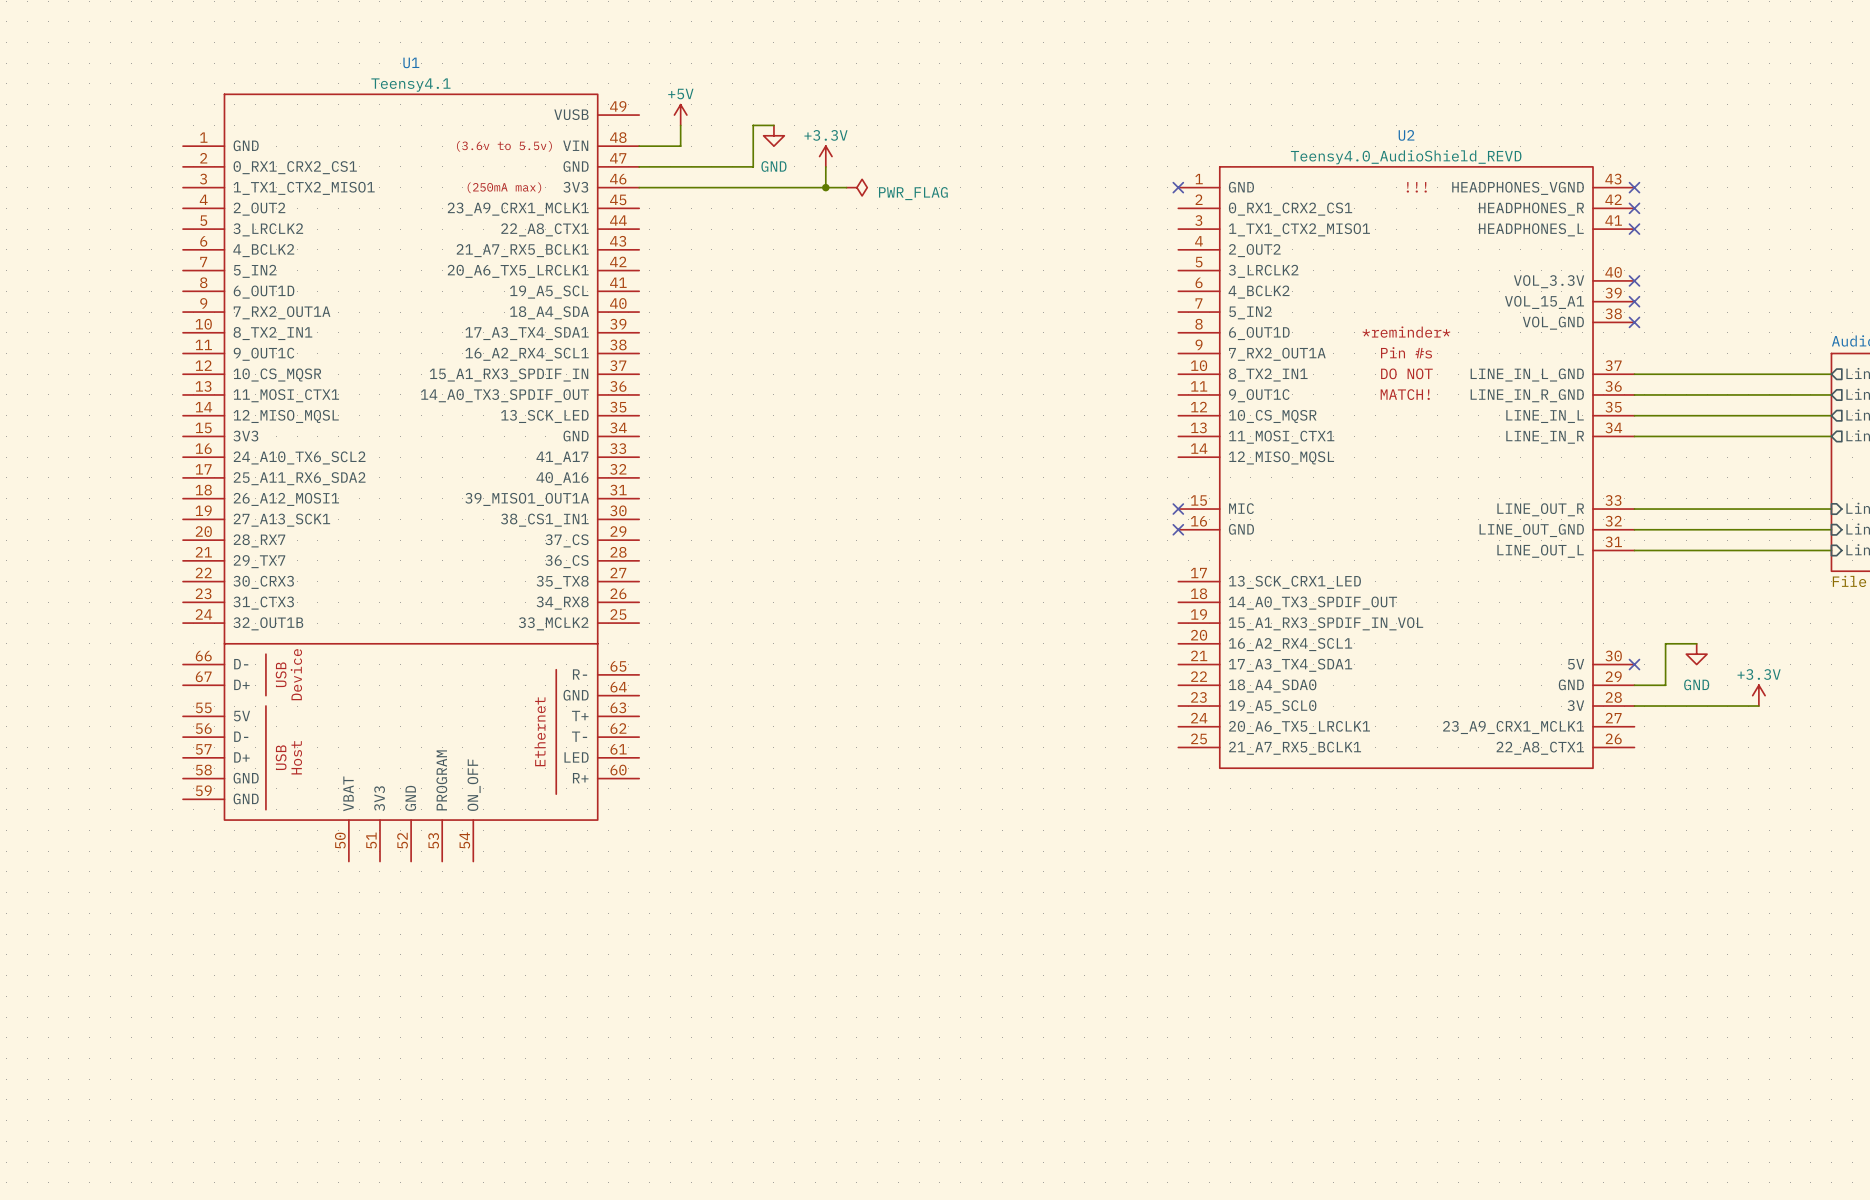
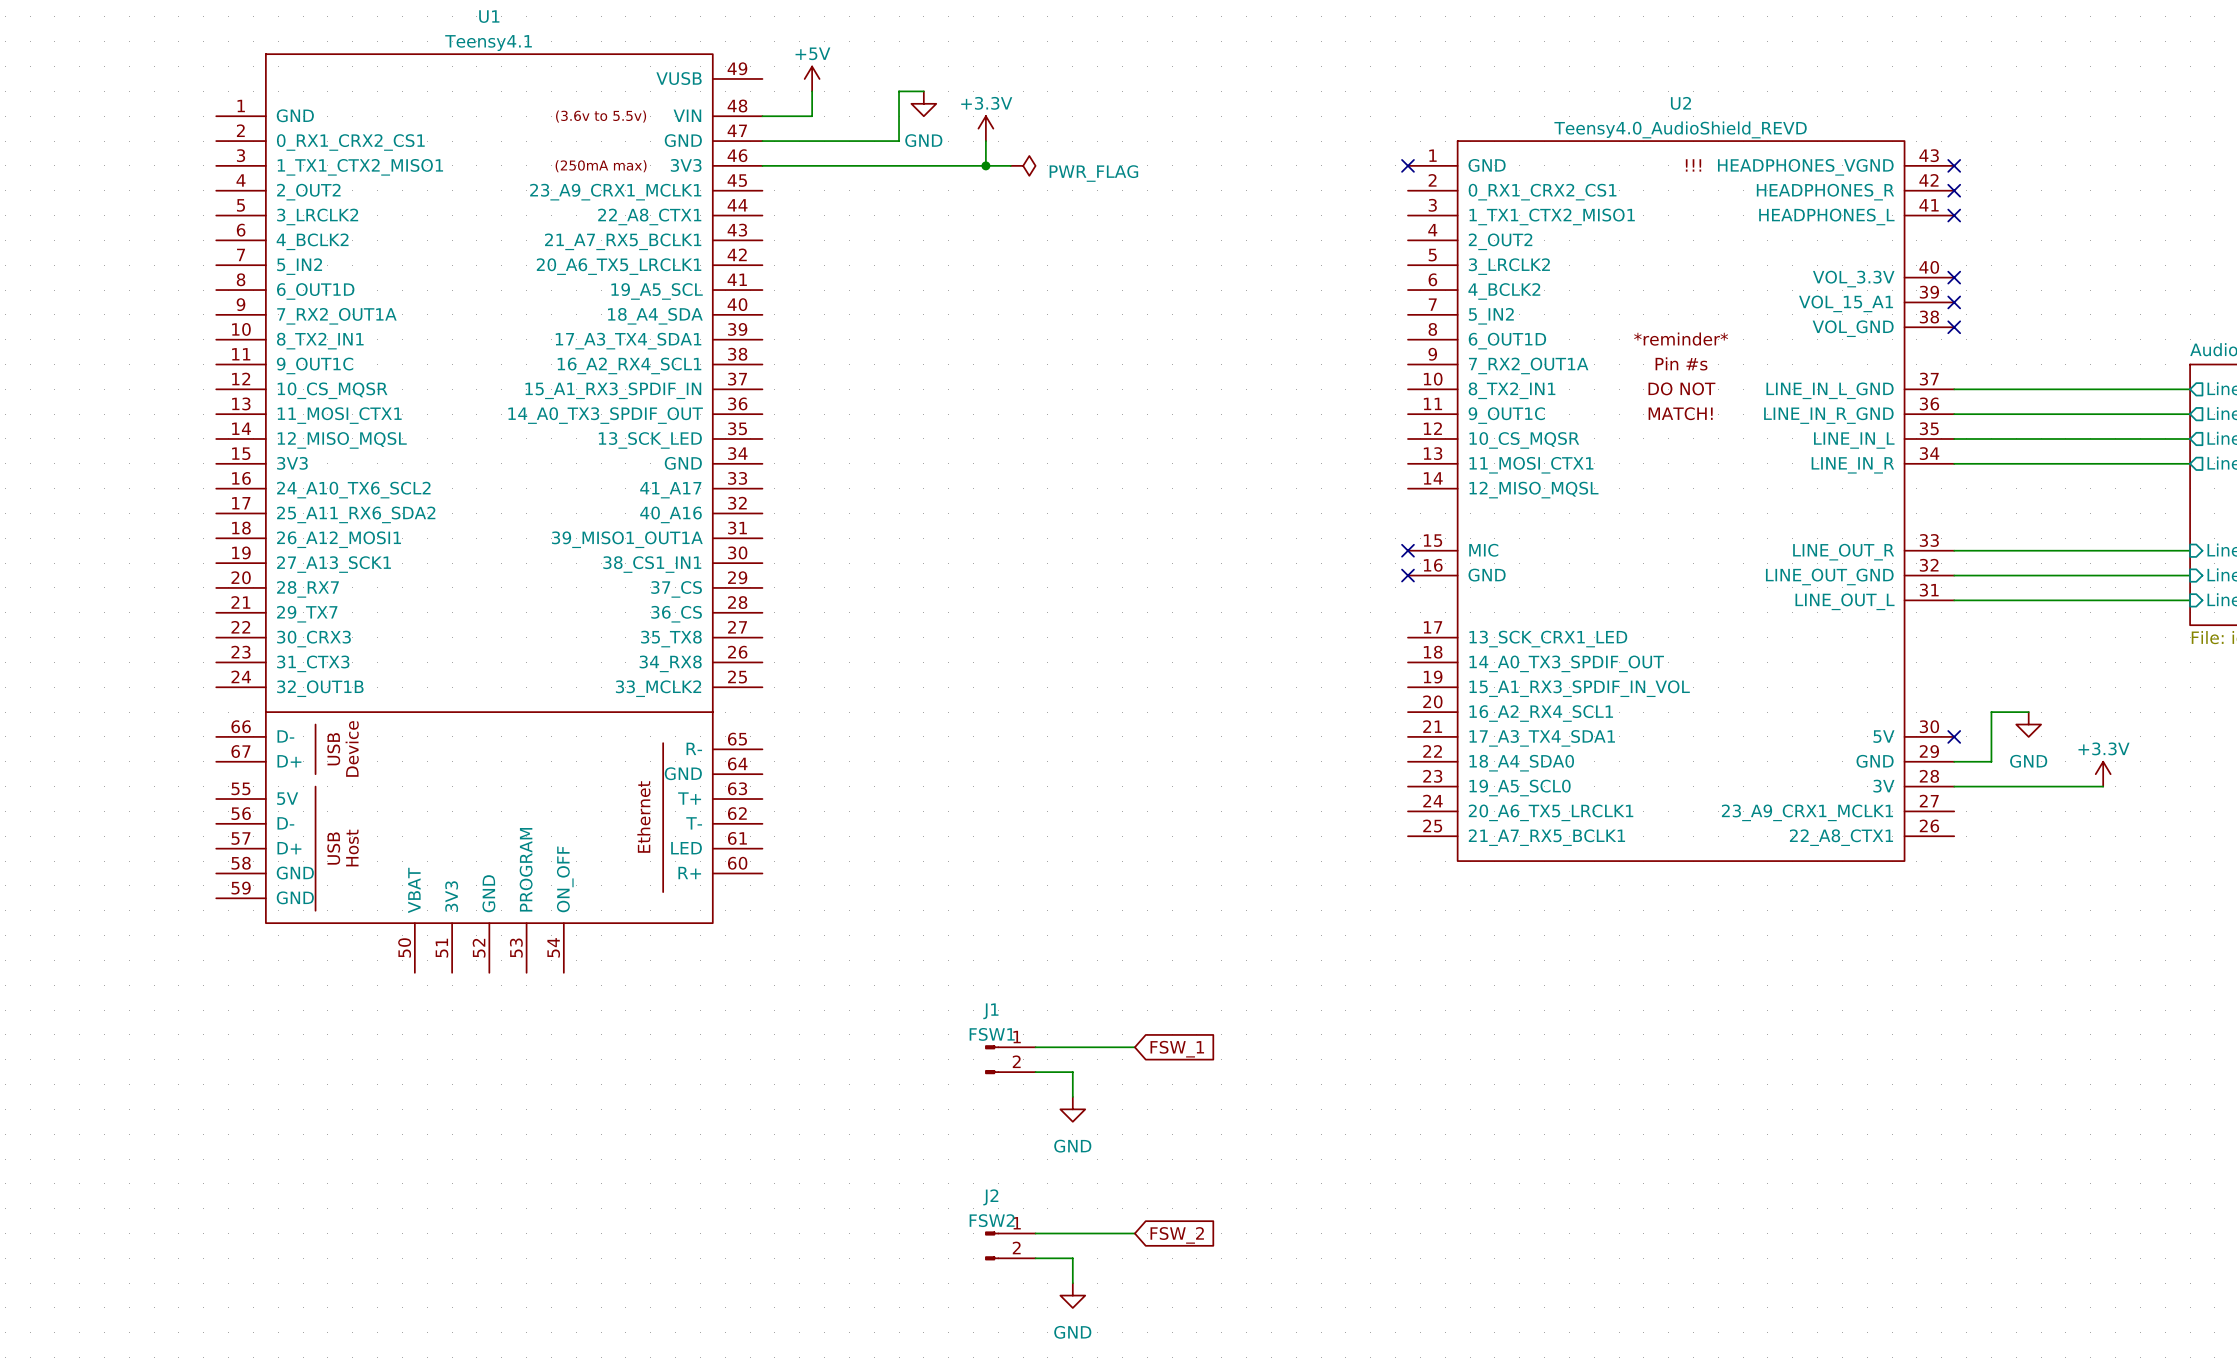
wire: none -> (1035, 1047) (1134, 1047)
global label: none -> FSW_1 (1177, 1049)
J1: none -> FSW1 (1010, 1059)
wire: none -> (1035, 1072) (1072, 1072) (1072, 1096)
power symbol: none -> GND (1072, 1109)
wire: none -> (1035, 1233) (1134, 1233)
global label: none -> FSW_2 (1177, 1235)
J2: none -> FSW2 (1010, 1245)
wire: none -> (1035, 1258) (1072, 1258) (1072, 1283)
power symbol: none -> GND (1072, 1295)

